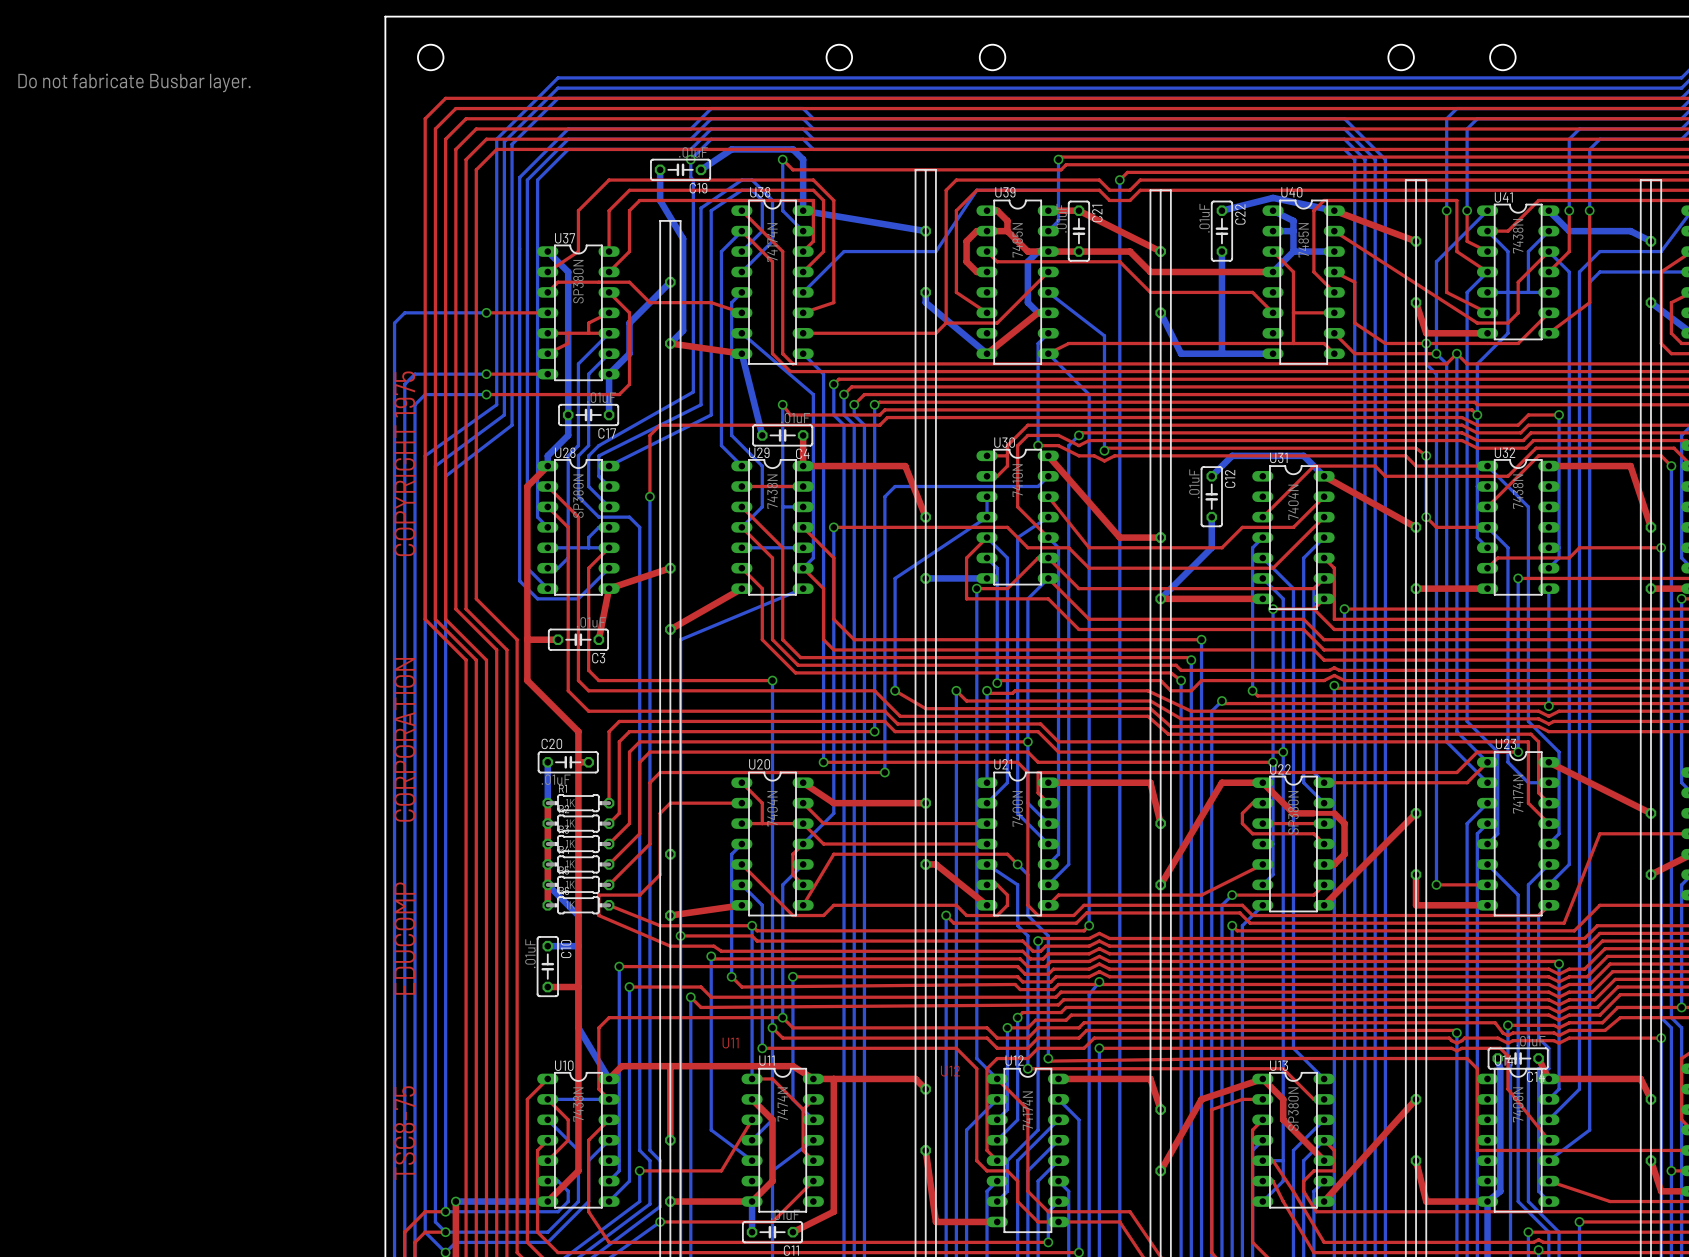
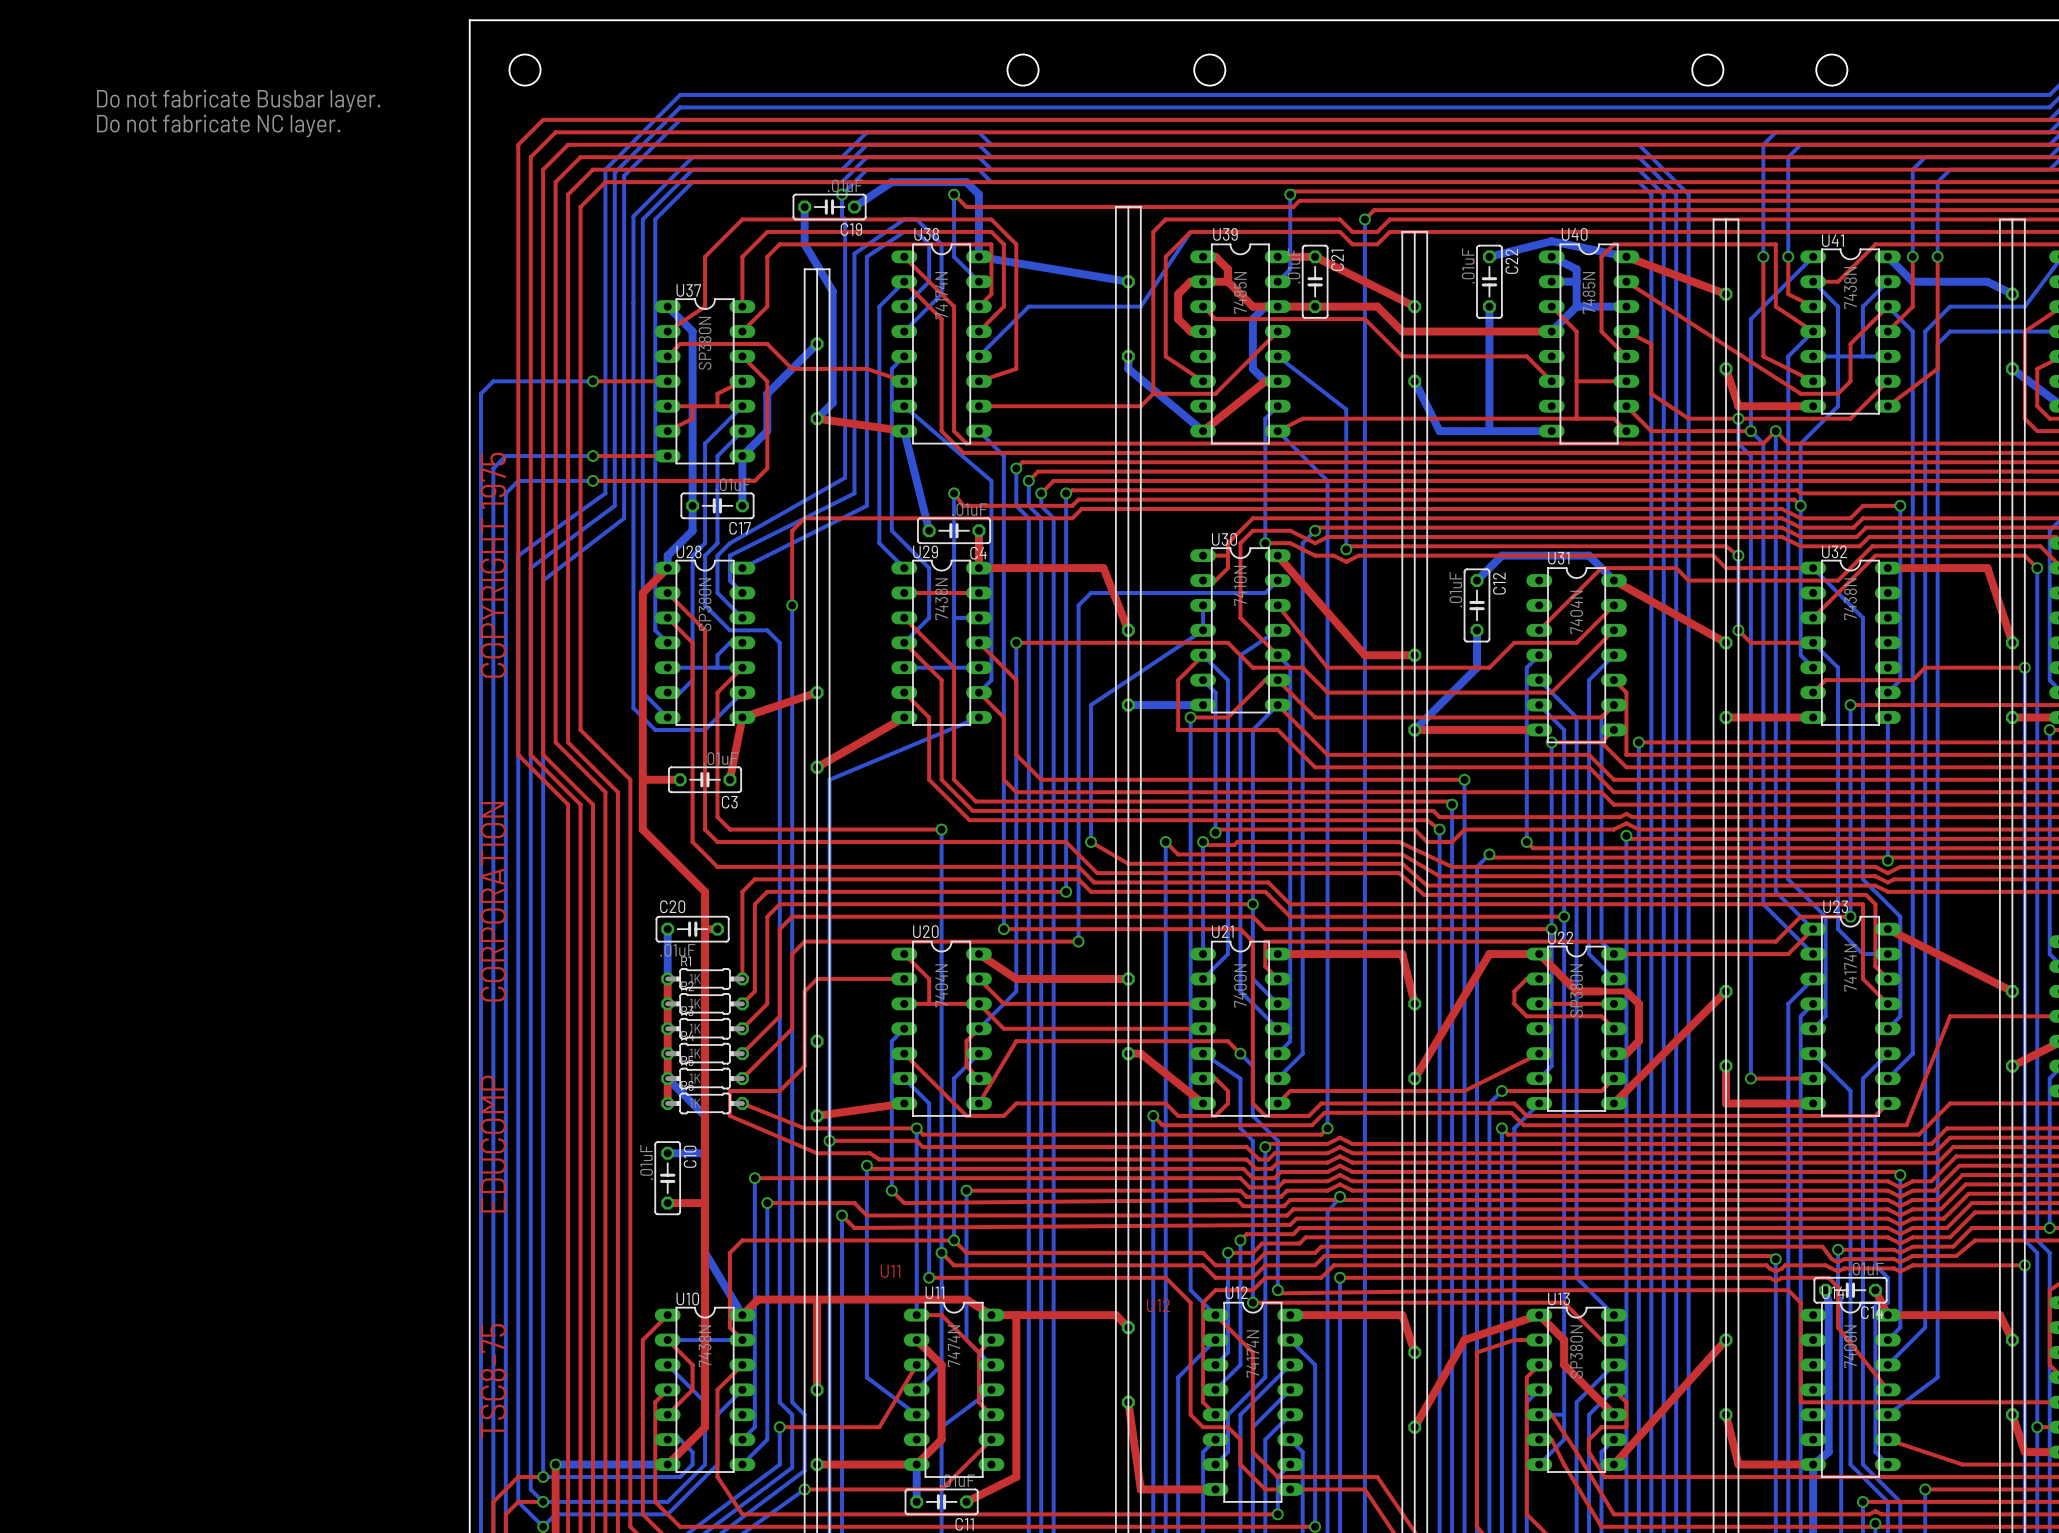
text position: Do not fabricate Busbar layer. (134, 82) -> Do not fabricate Busbar layer. (238, 101)
text: none -> Do not fabricate NC layer. (218, 125)

